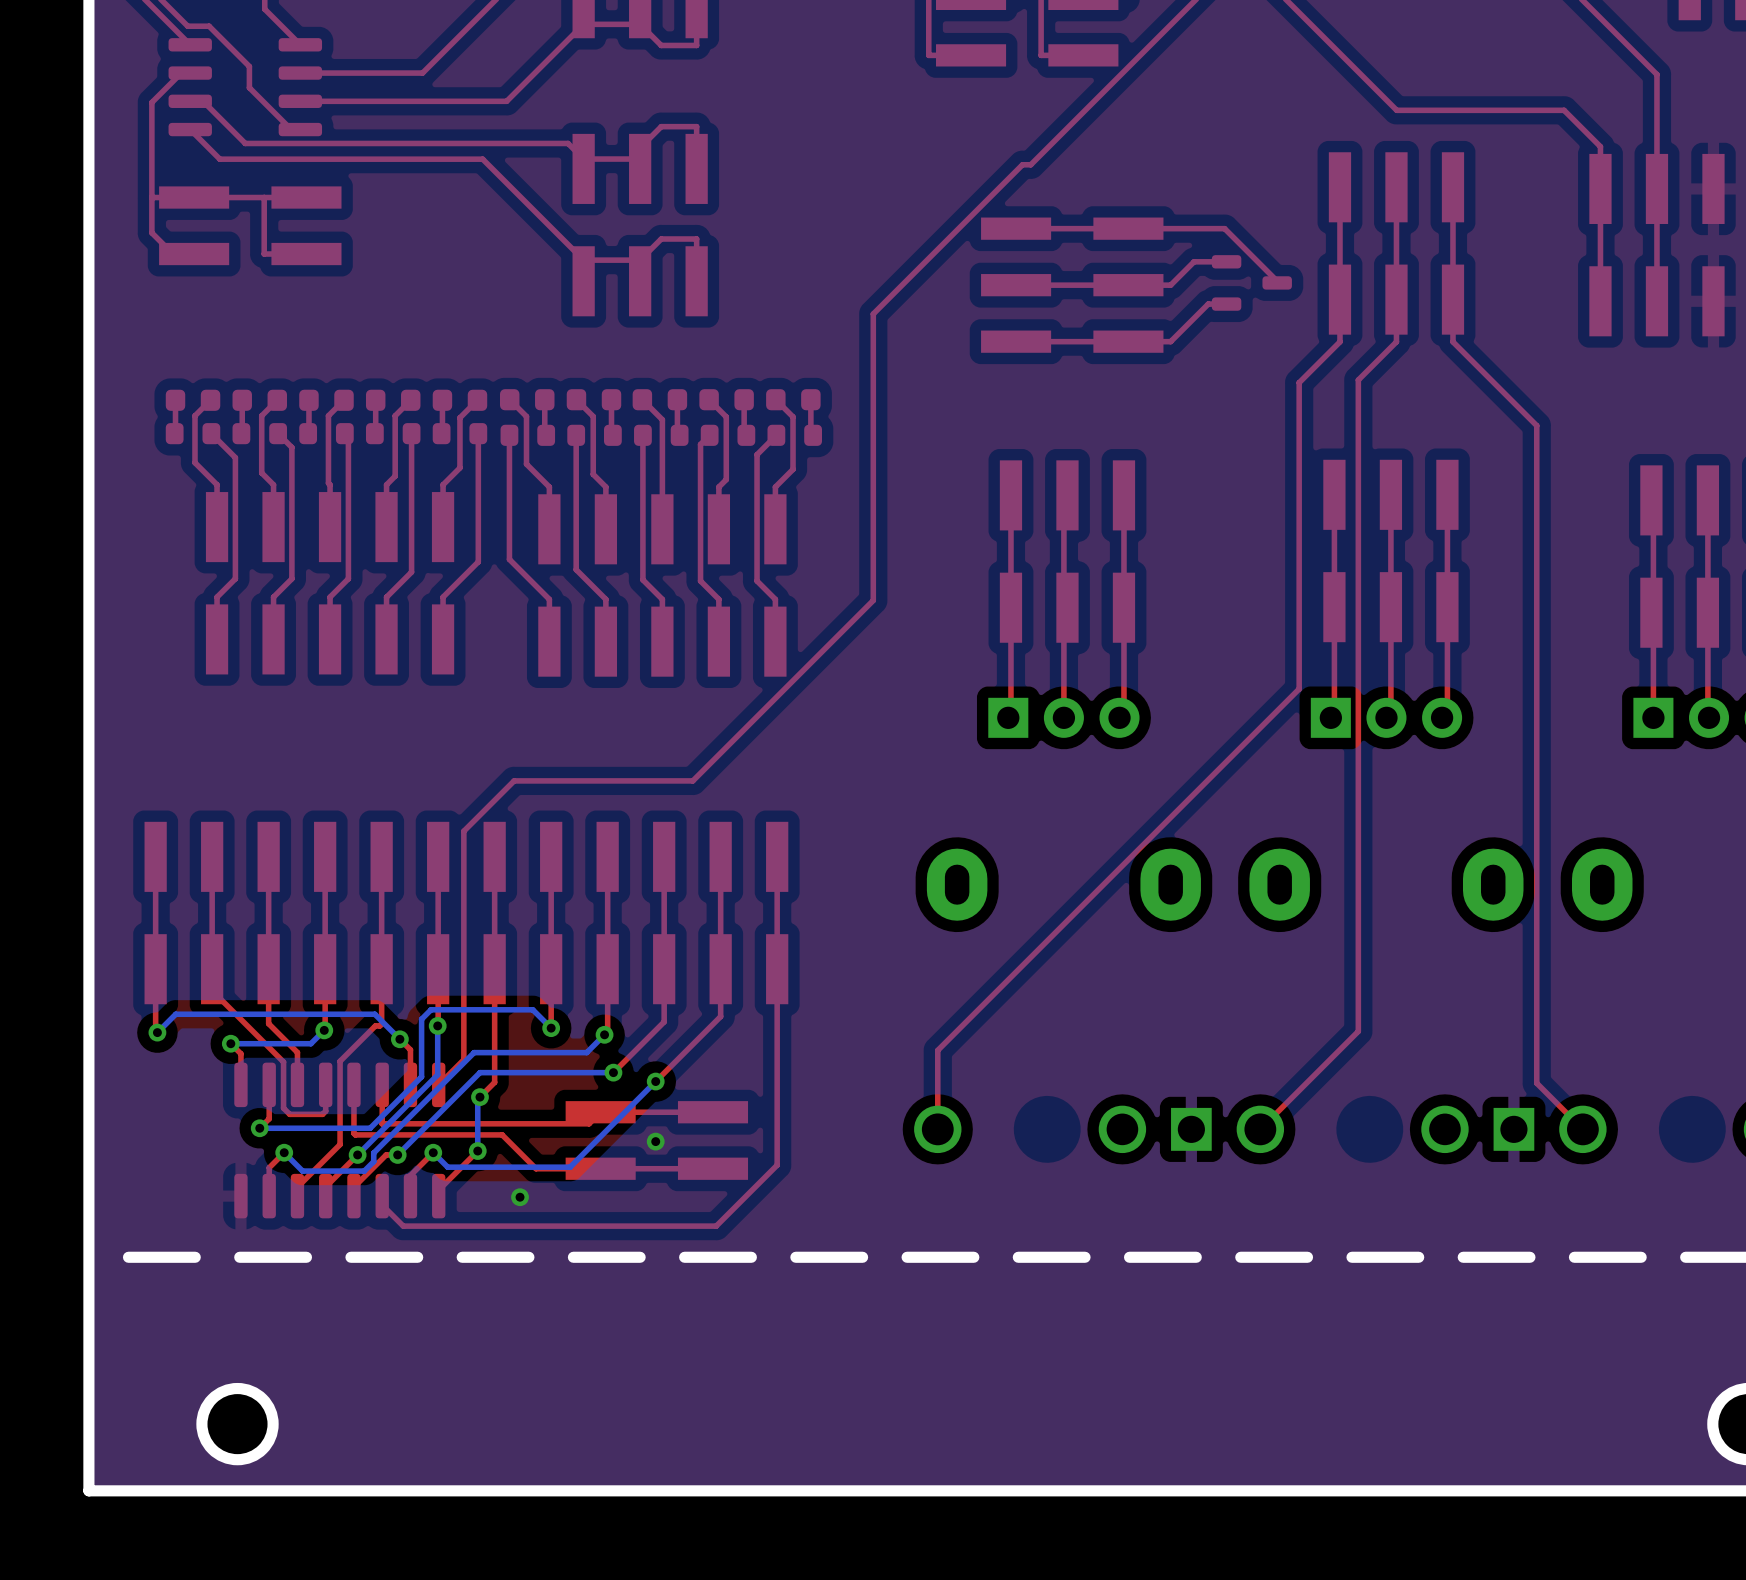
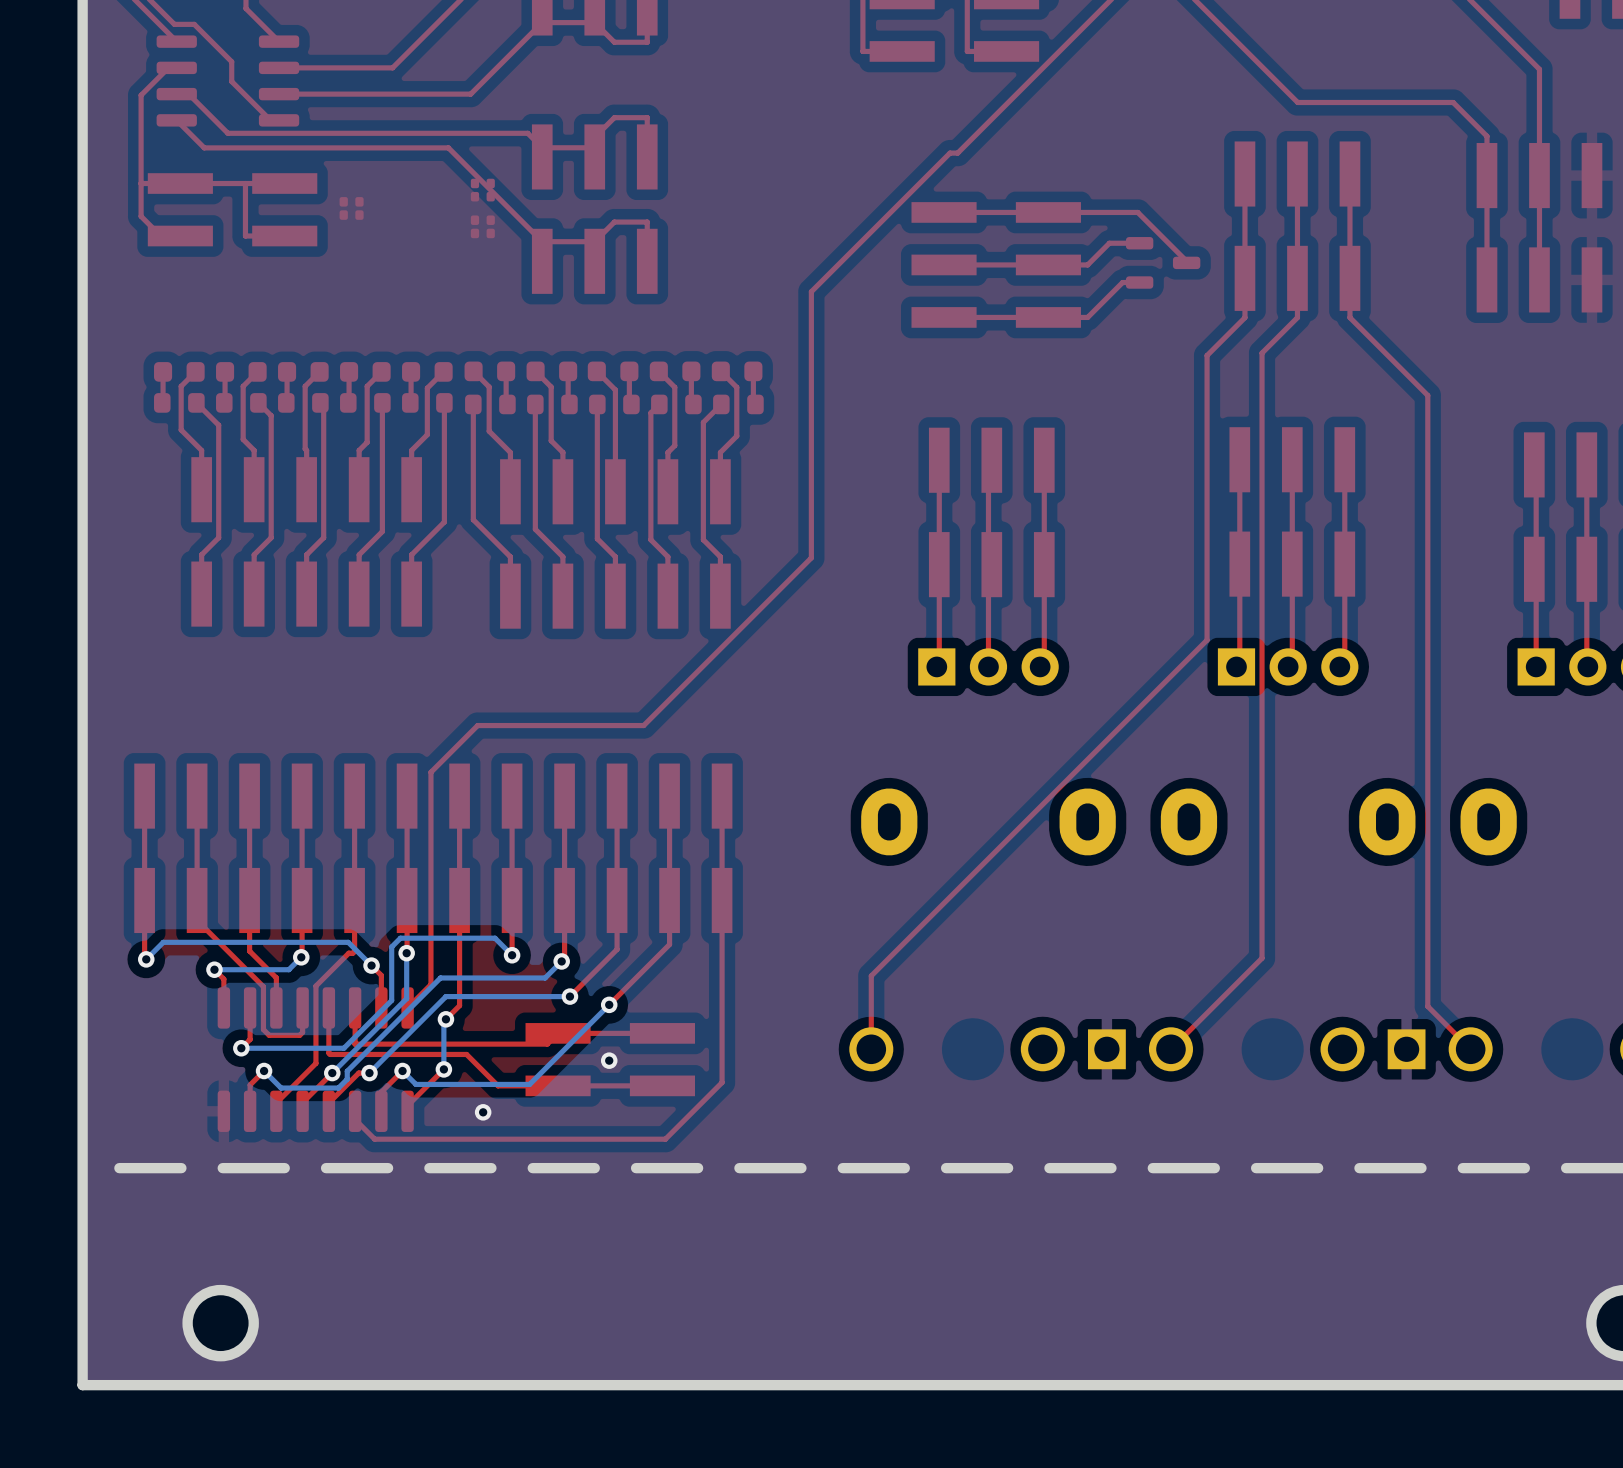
part: none -> (474, 190)
part: none -> (490, 190)
part: none -> (343, 208)
part: none -> (359, 208)
part: none -> (474, 226)
part: none -> (490, 226)

